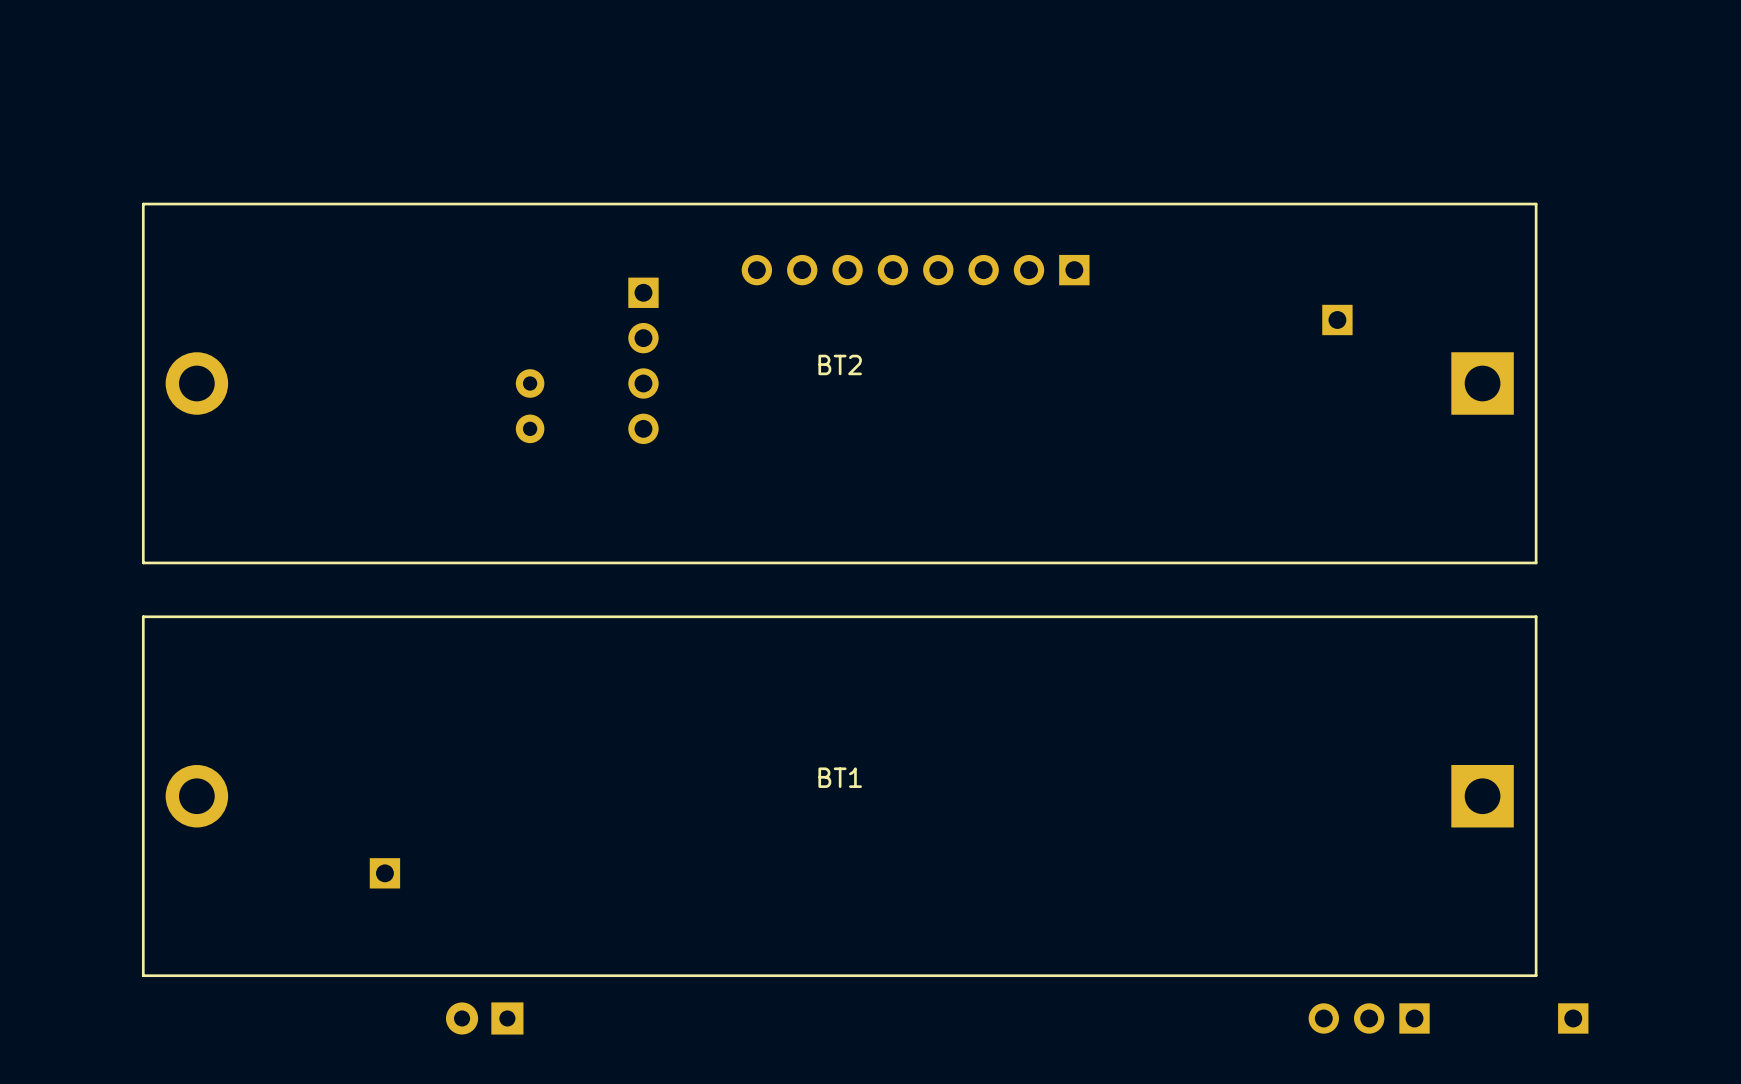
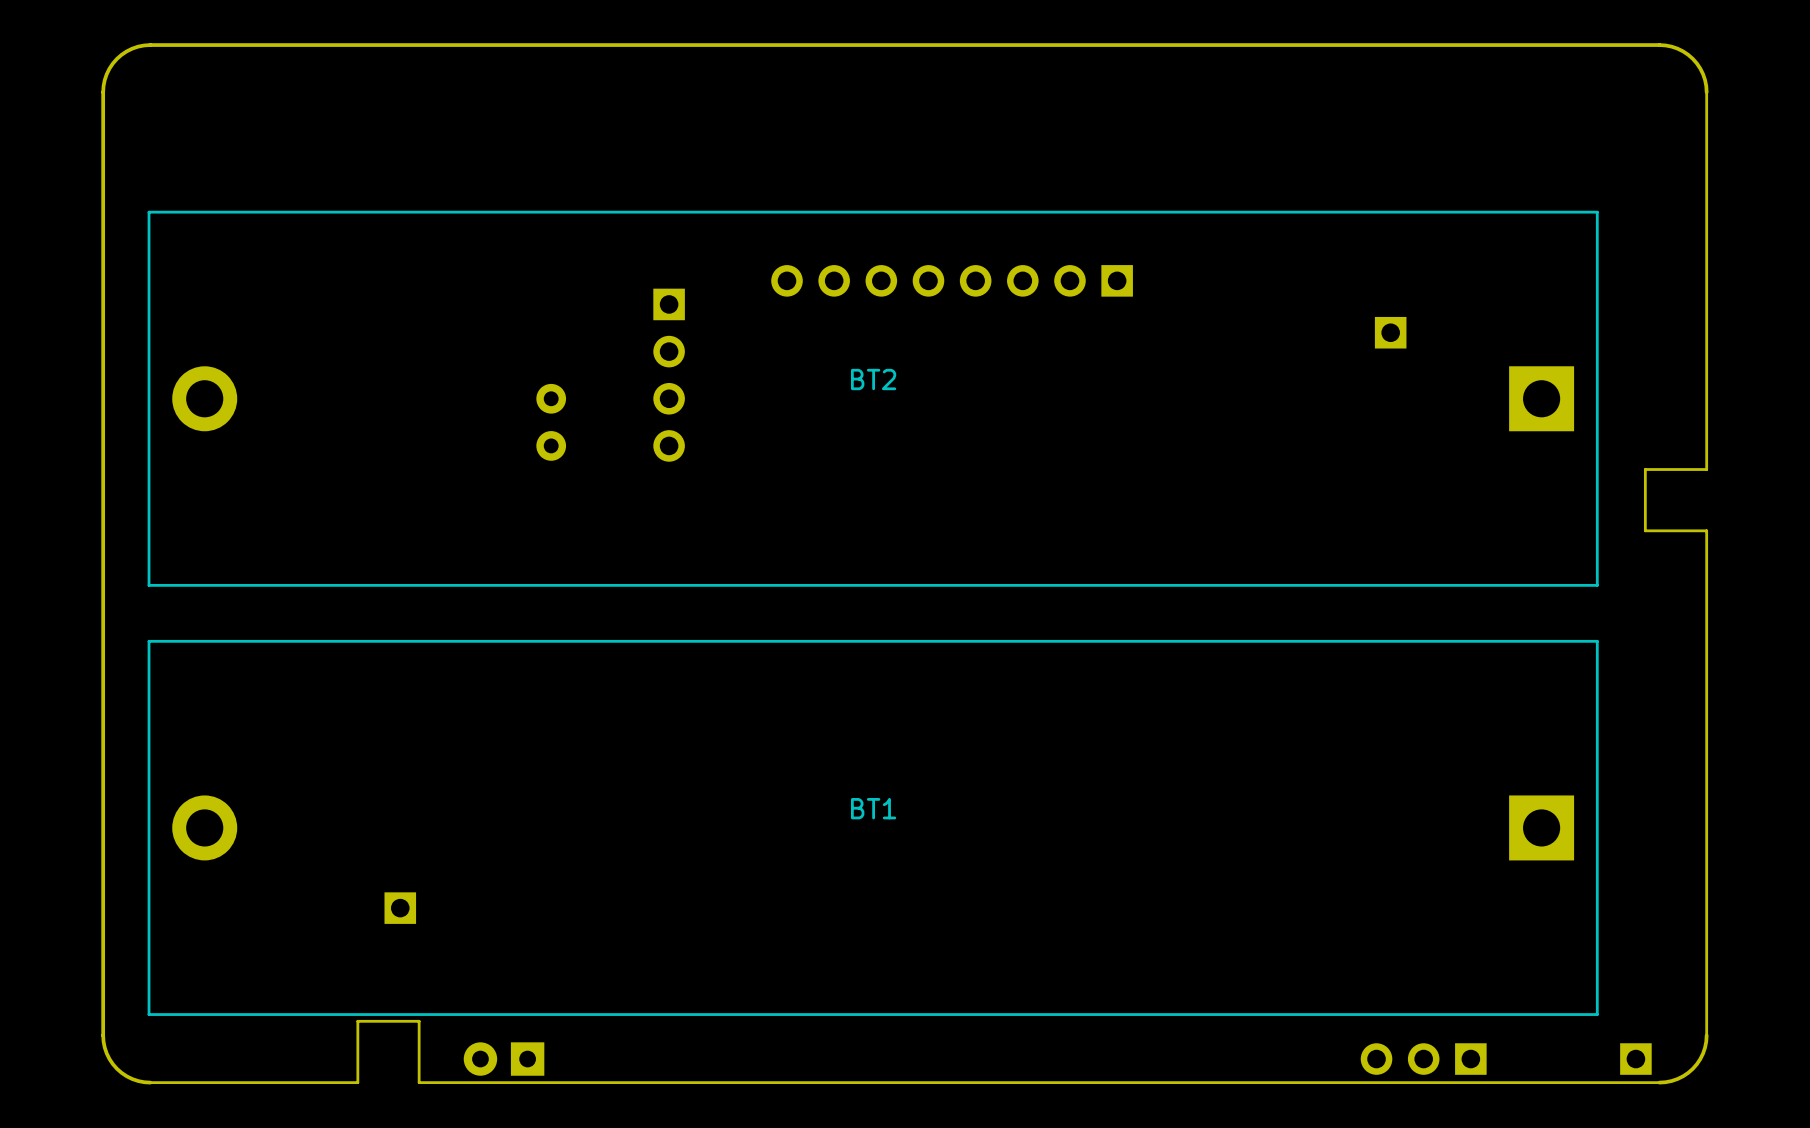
board edge: none -> (1659, 45) (150, 45) (138, 46) (126, 51) (116, 58) (109, 68) (104, 80) (103, 92) (103, 1035) (104, 1047) (109, 1059) (116, 1068) (126, 1076) (144, 1082) (357, 1082) (357, 1021) (419, 1021) (419, 1082) (1659, 1082) (1671, 1081) (1683, 1076) (1692, 1068) (1700, 1059) (1705, 1047) (1706, 1035) (1706, 530) (1645, 530) (1645, 469) (1706, 469) (1706, 92) (1703, 74) (1692, 58) (1677, 48) (1659, 45)

